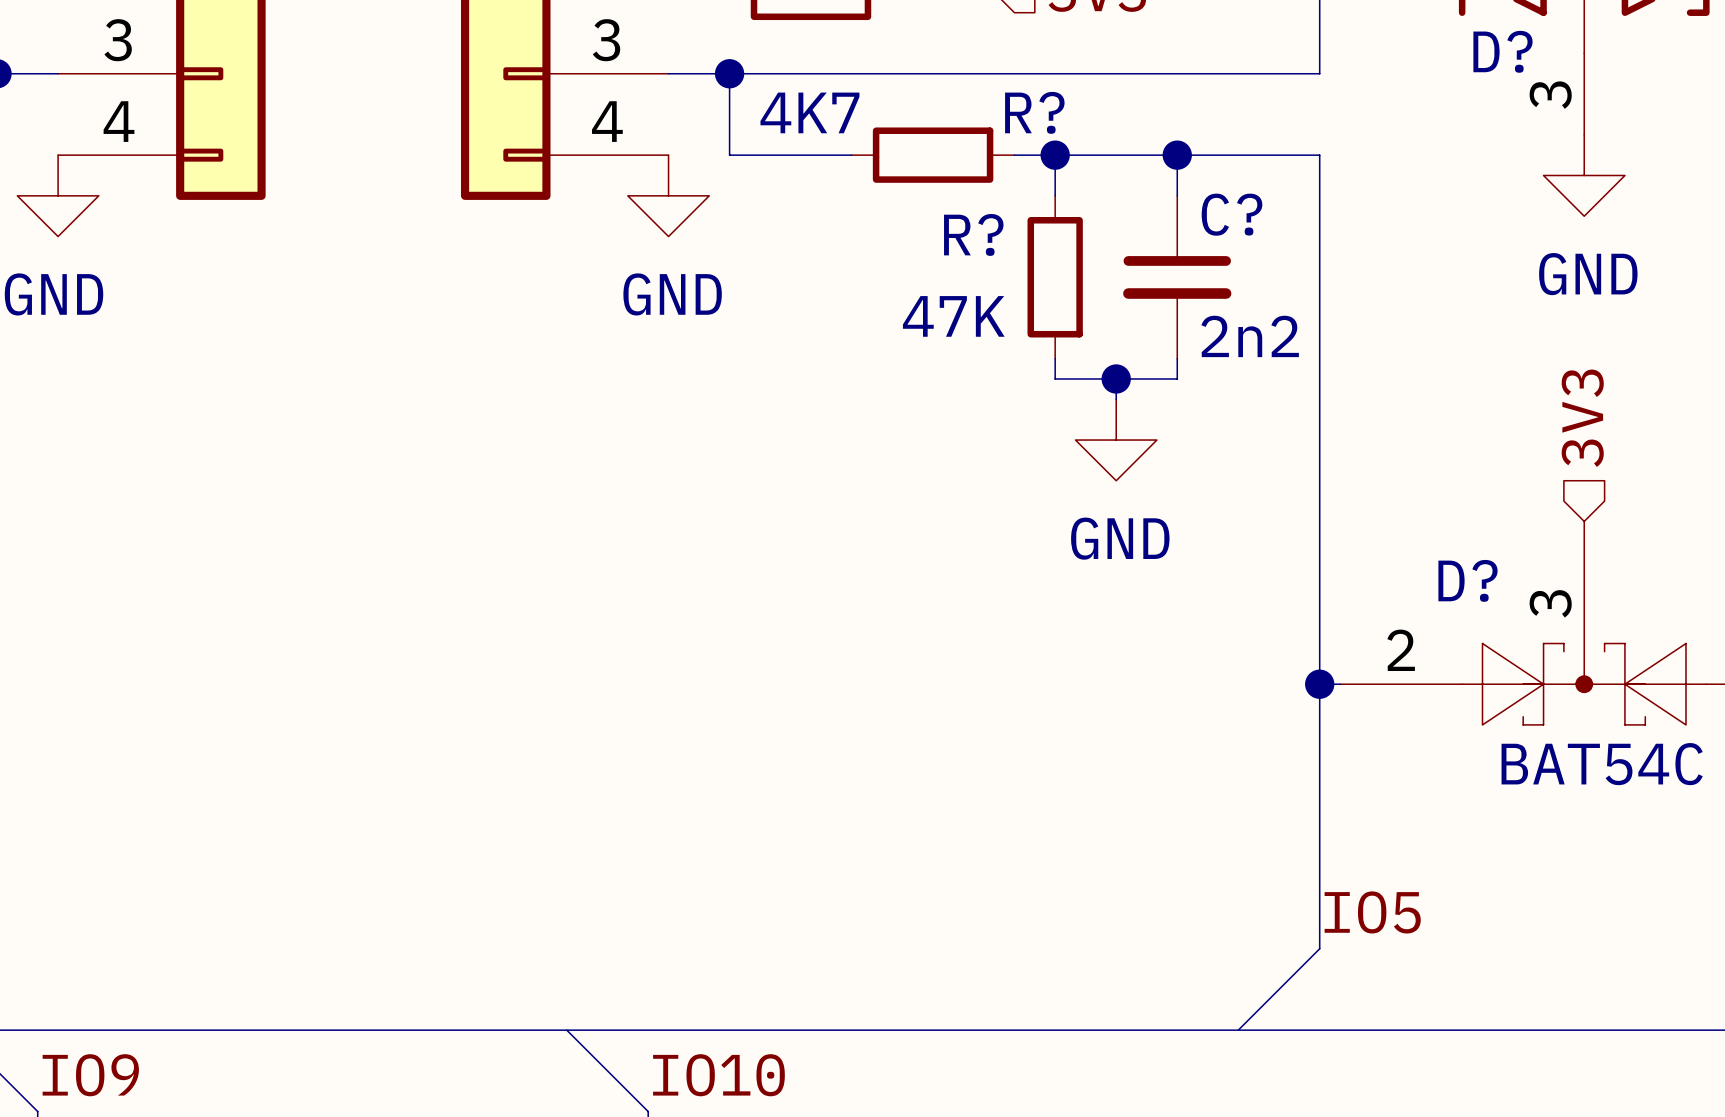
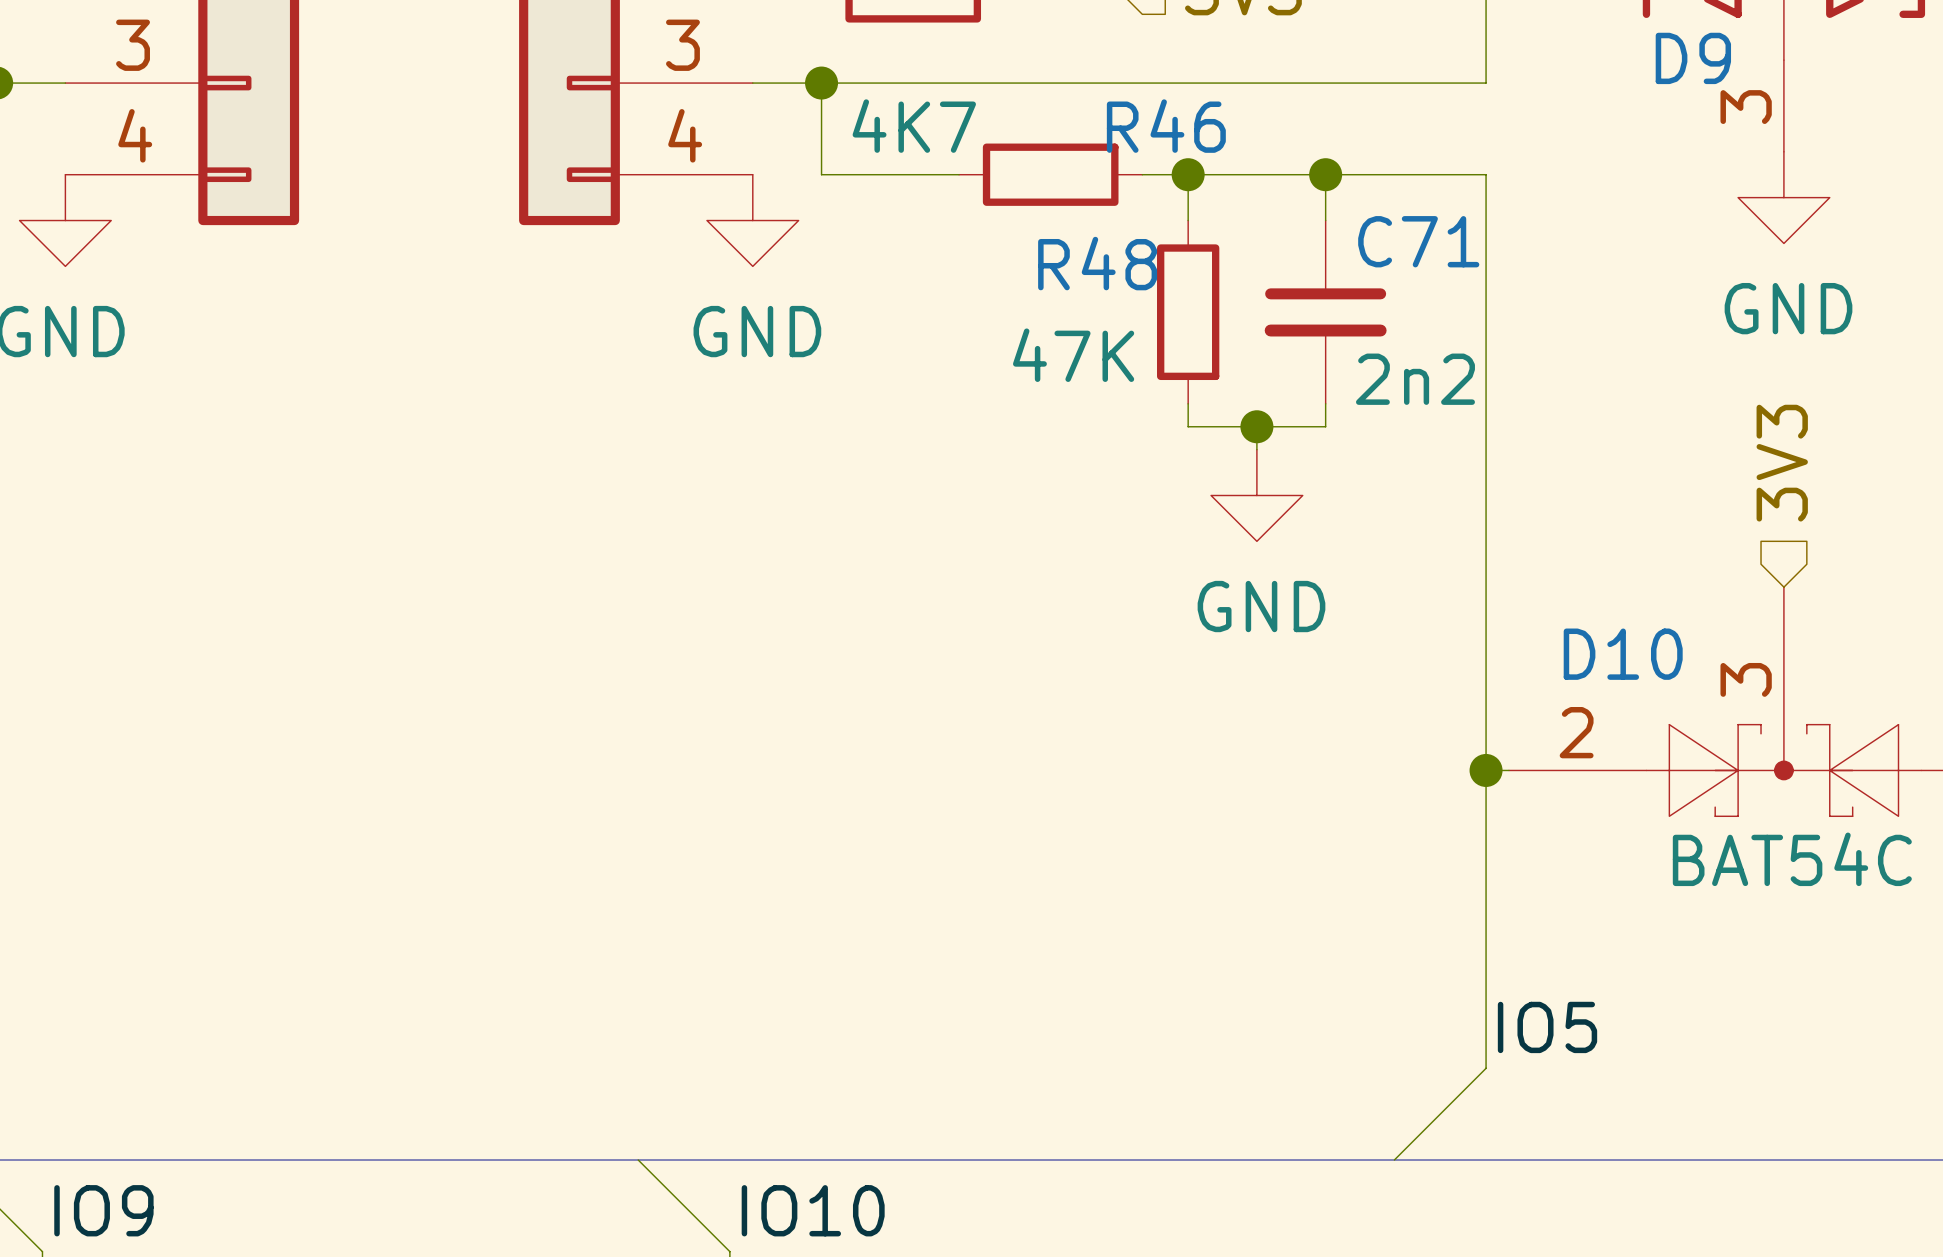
D? name: D? (1502, 51) -> D9 (1693, 58)
R? name: R? (1034, 112) -> R46 (1166, 126)
C? name: C? (1232, 214) -> C71 (1418, 241)
R? name: R? (973, 234) -> R48 (1097, 263)
D? name: D? (1468, 580) -> D10 (1623, 654)

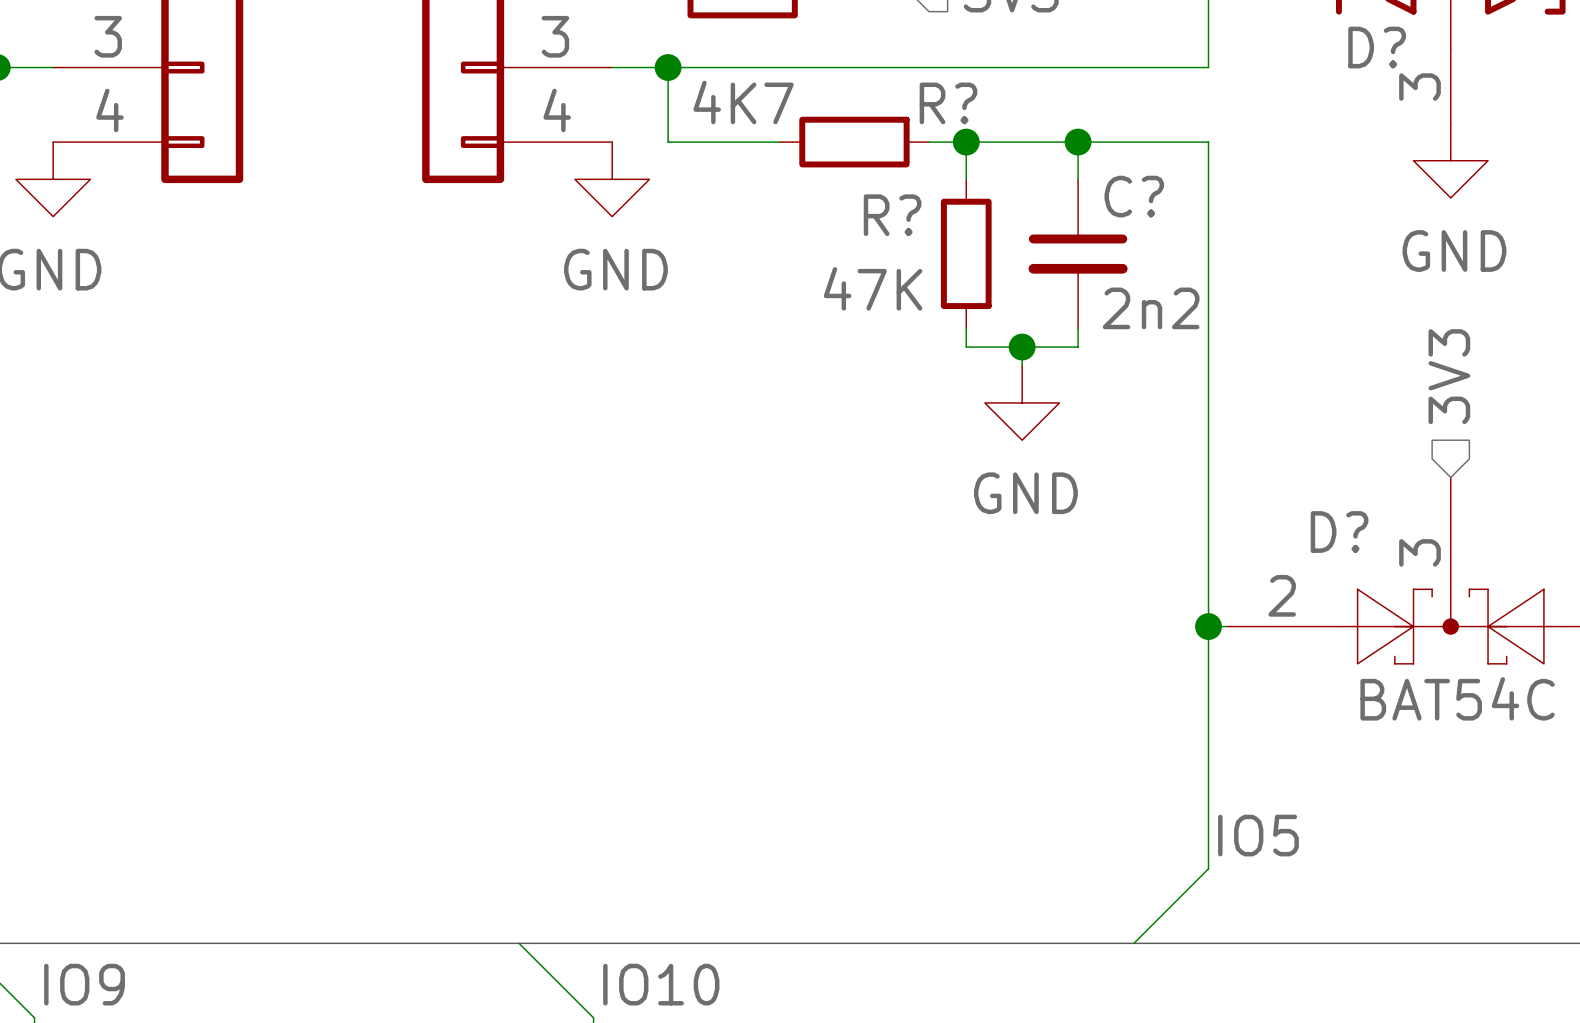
D9 name: D9 (1693, 58) -> D? (1377, 47)
R46 name: R46 (1166, 126) -> R? (948, 103)
C71 name: C71 (1418, 241) -> C? (1134, 196)
R48 name: R48 (1097, 263) -> R? (892, 215)
D10 name: D10 (1623, 654) -> D? (1339, 532)

